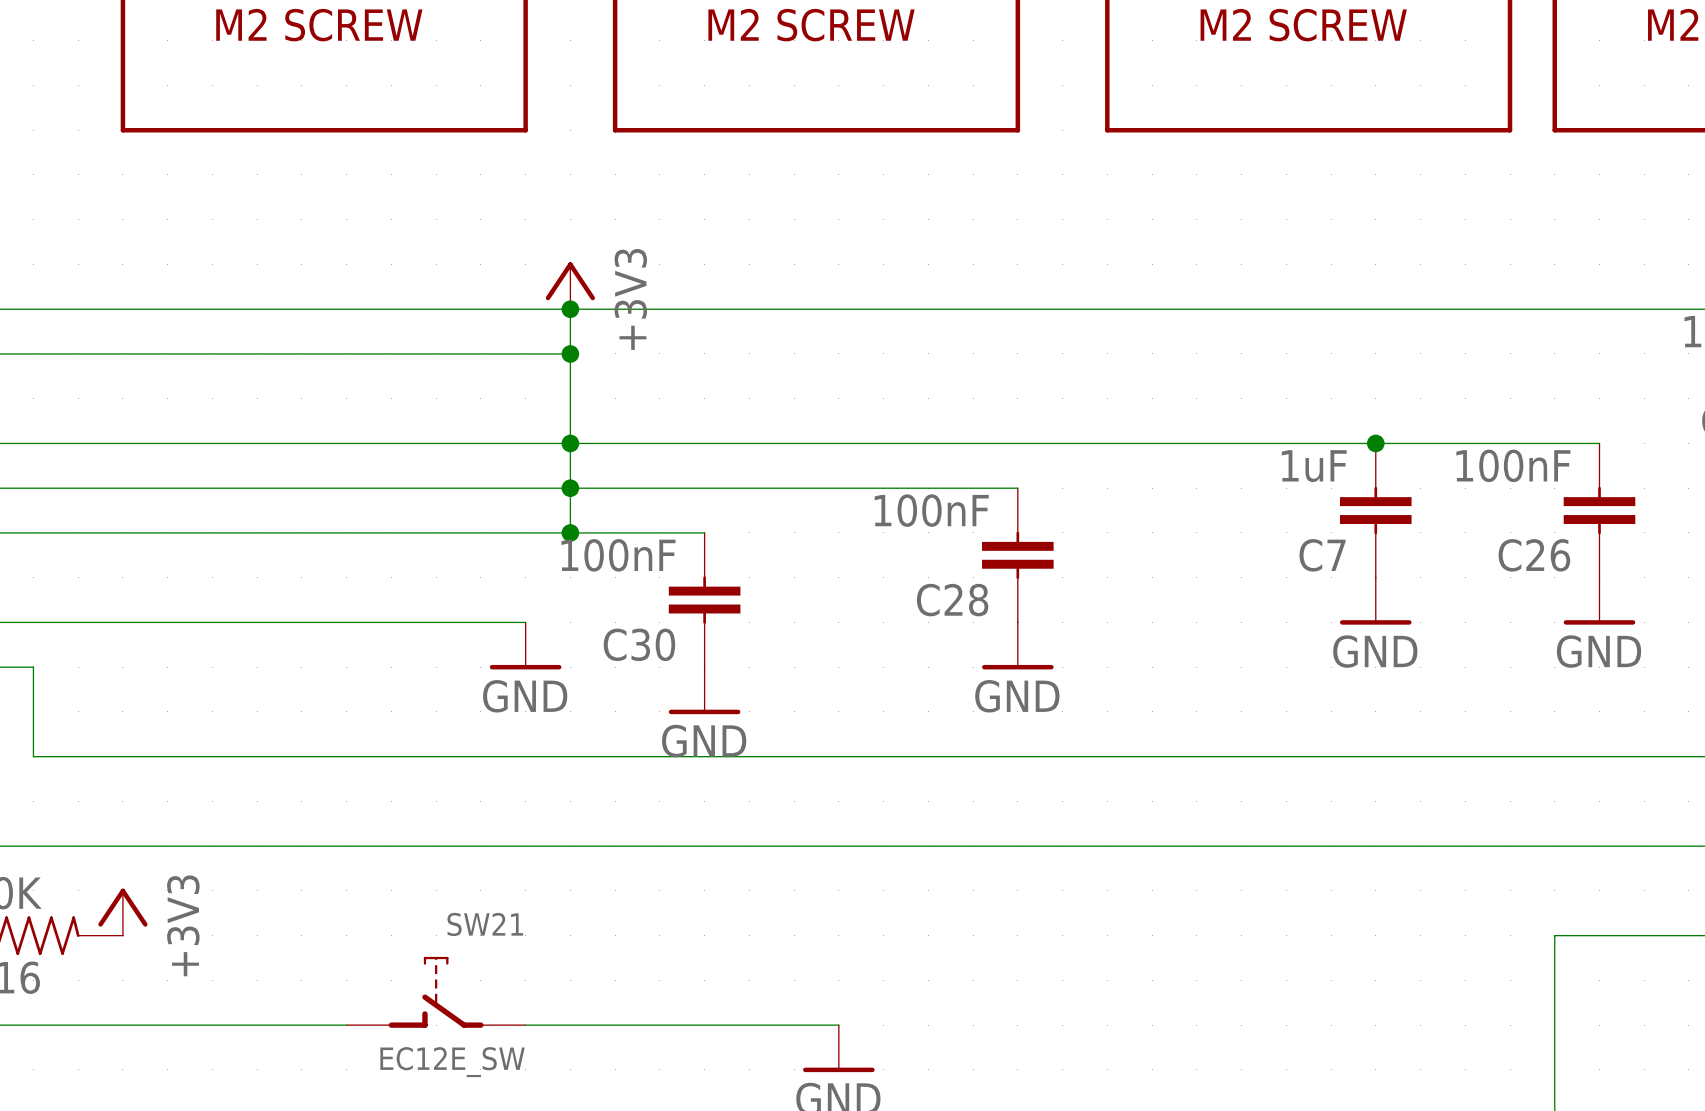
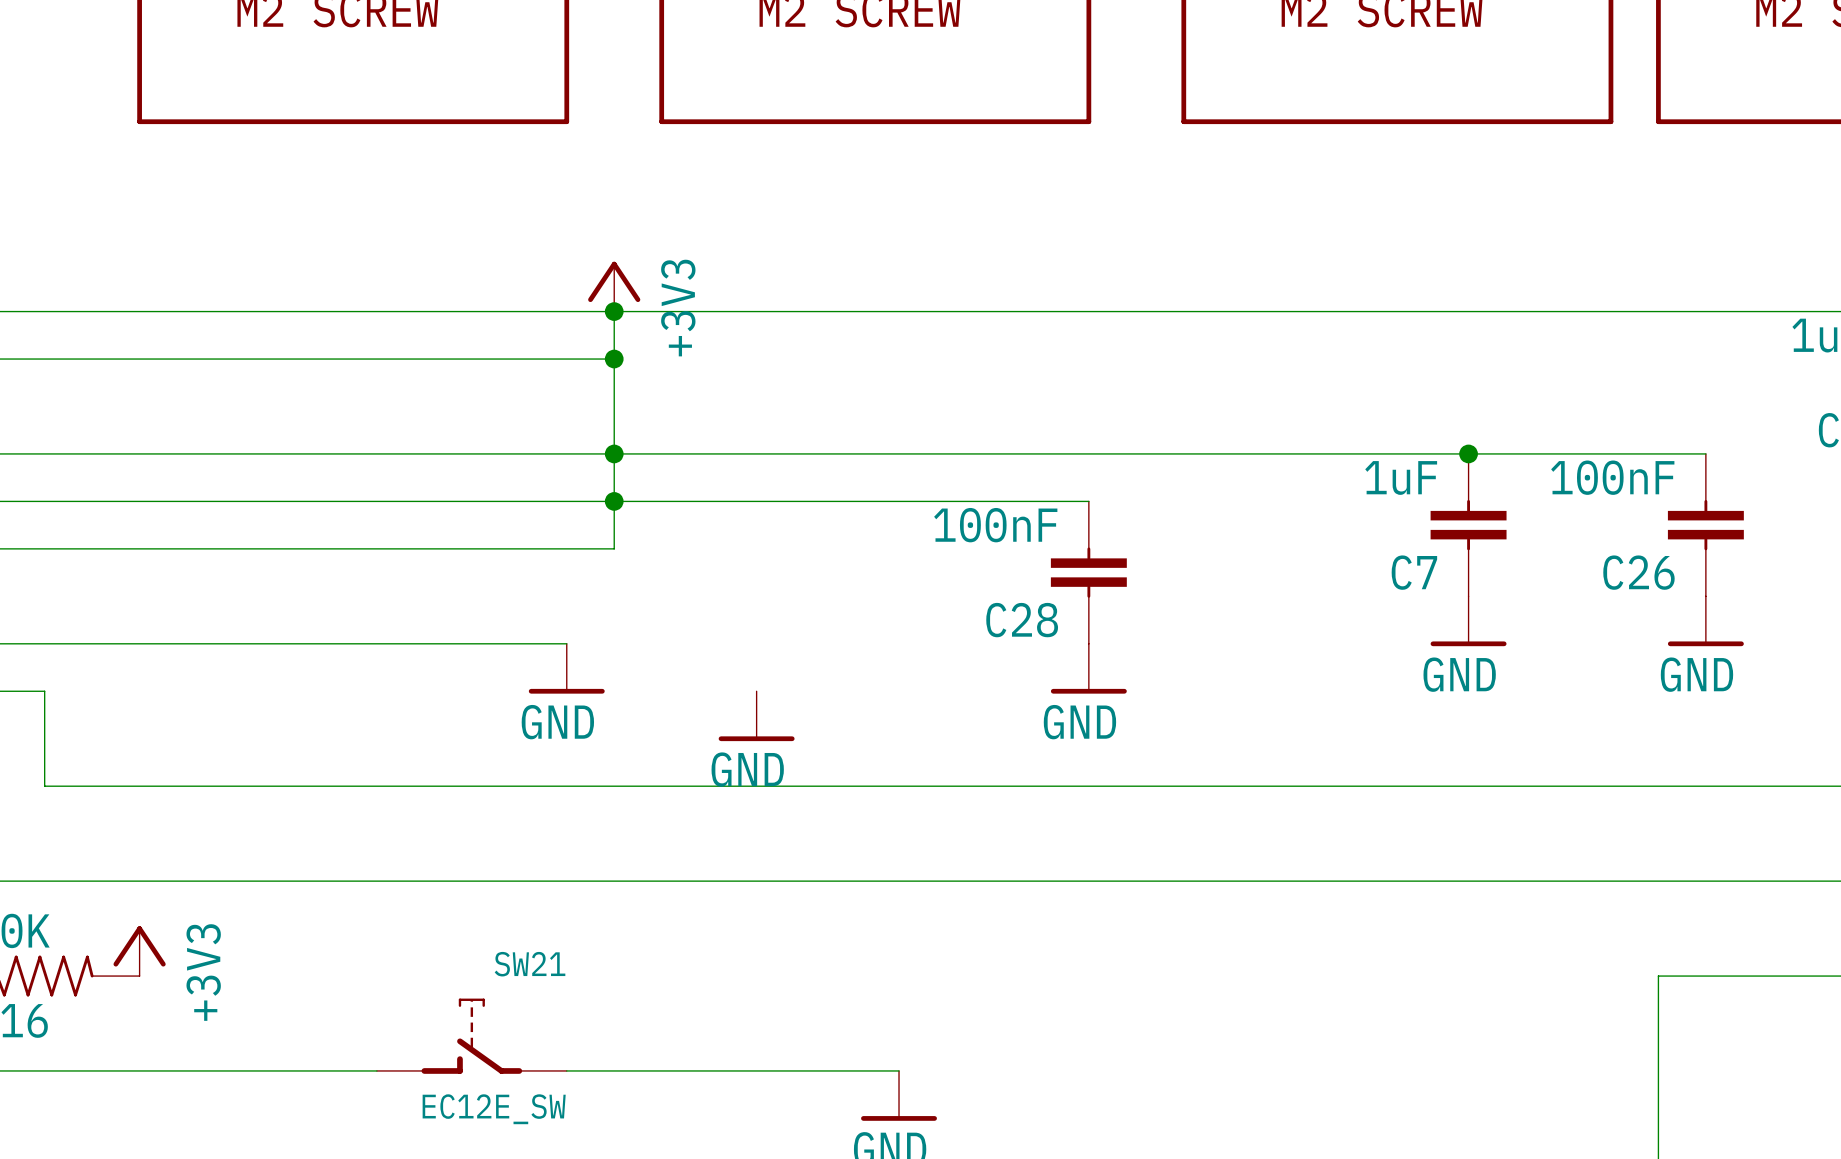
wire: (570, 532) (704, 532) -> none
junction: (570, 532) -> none
C30: 100nF (704, 600) -> none

